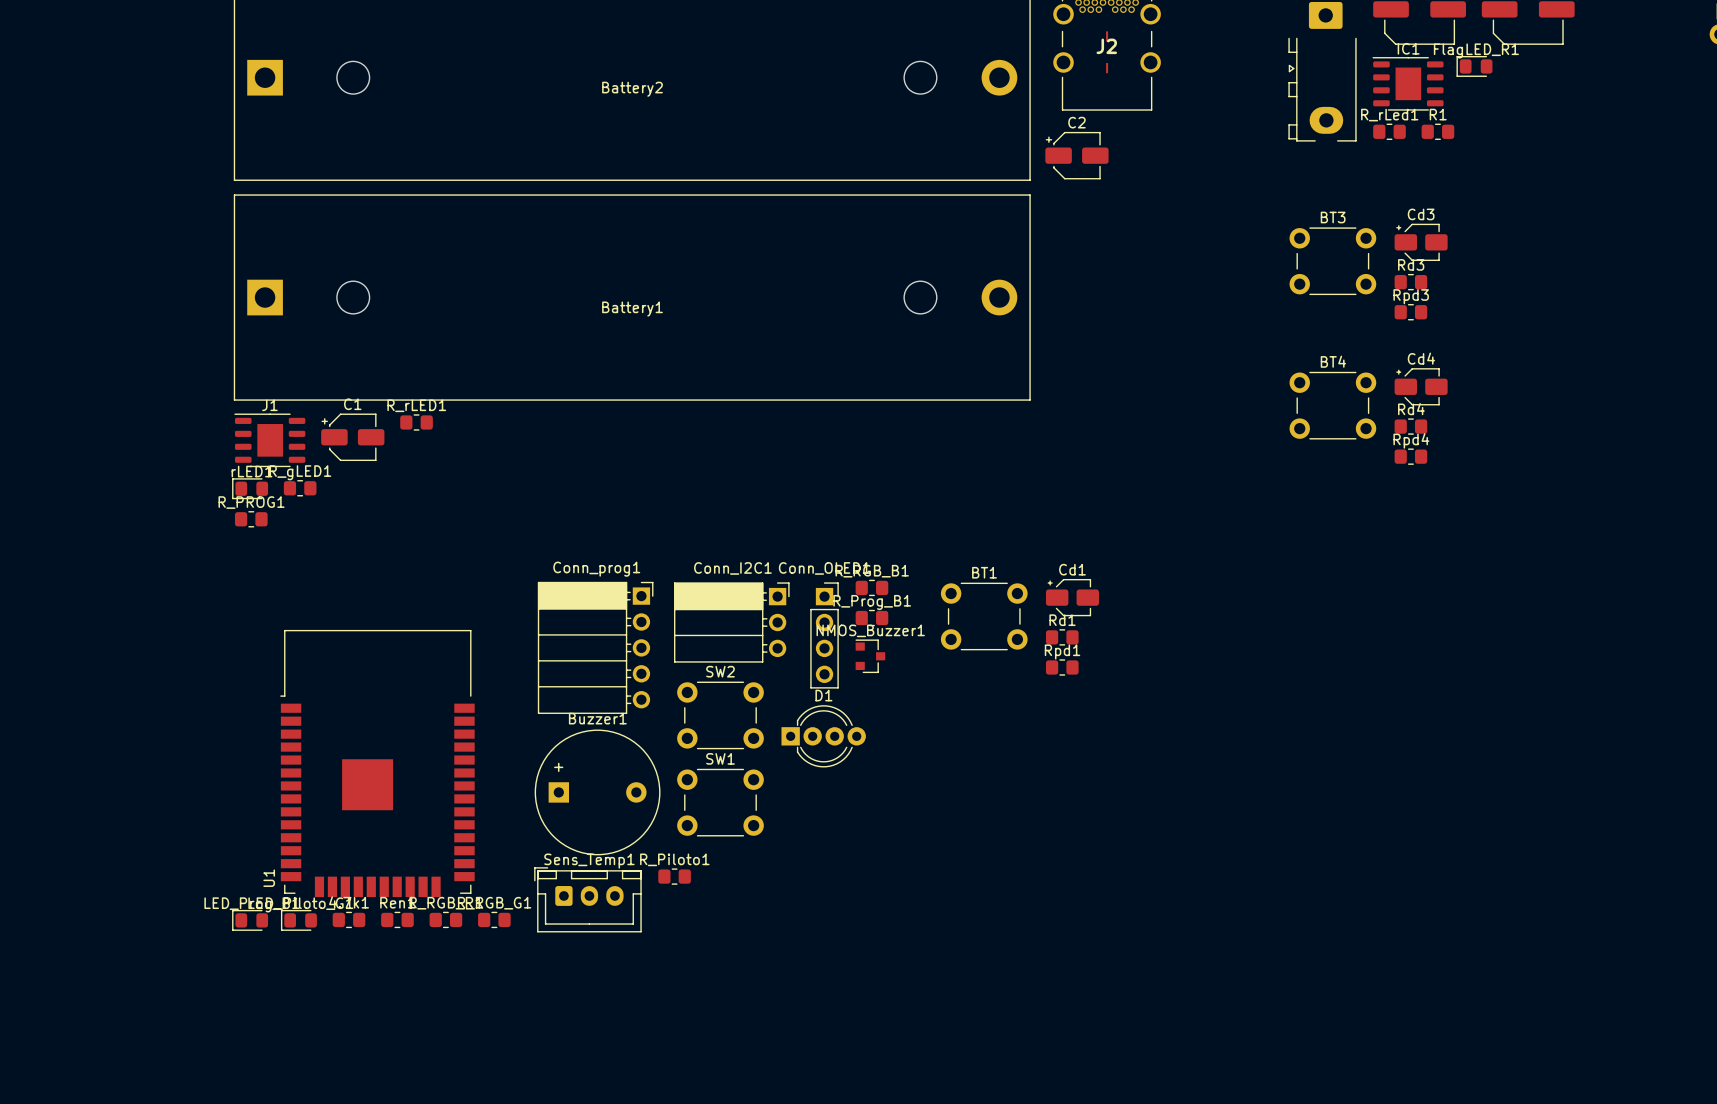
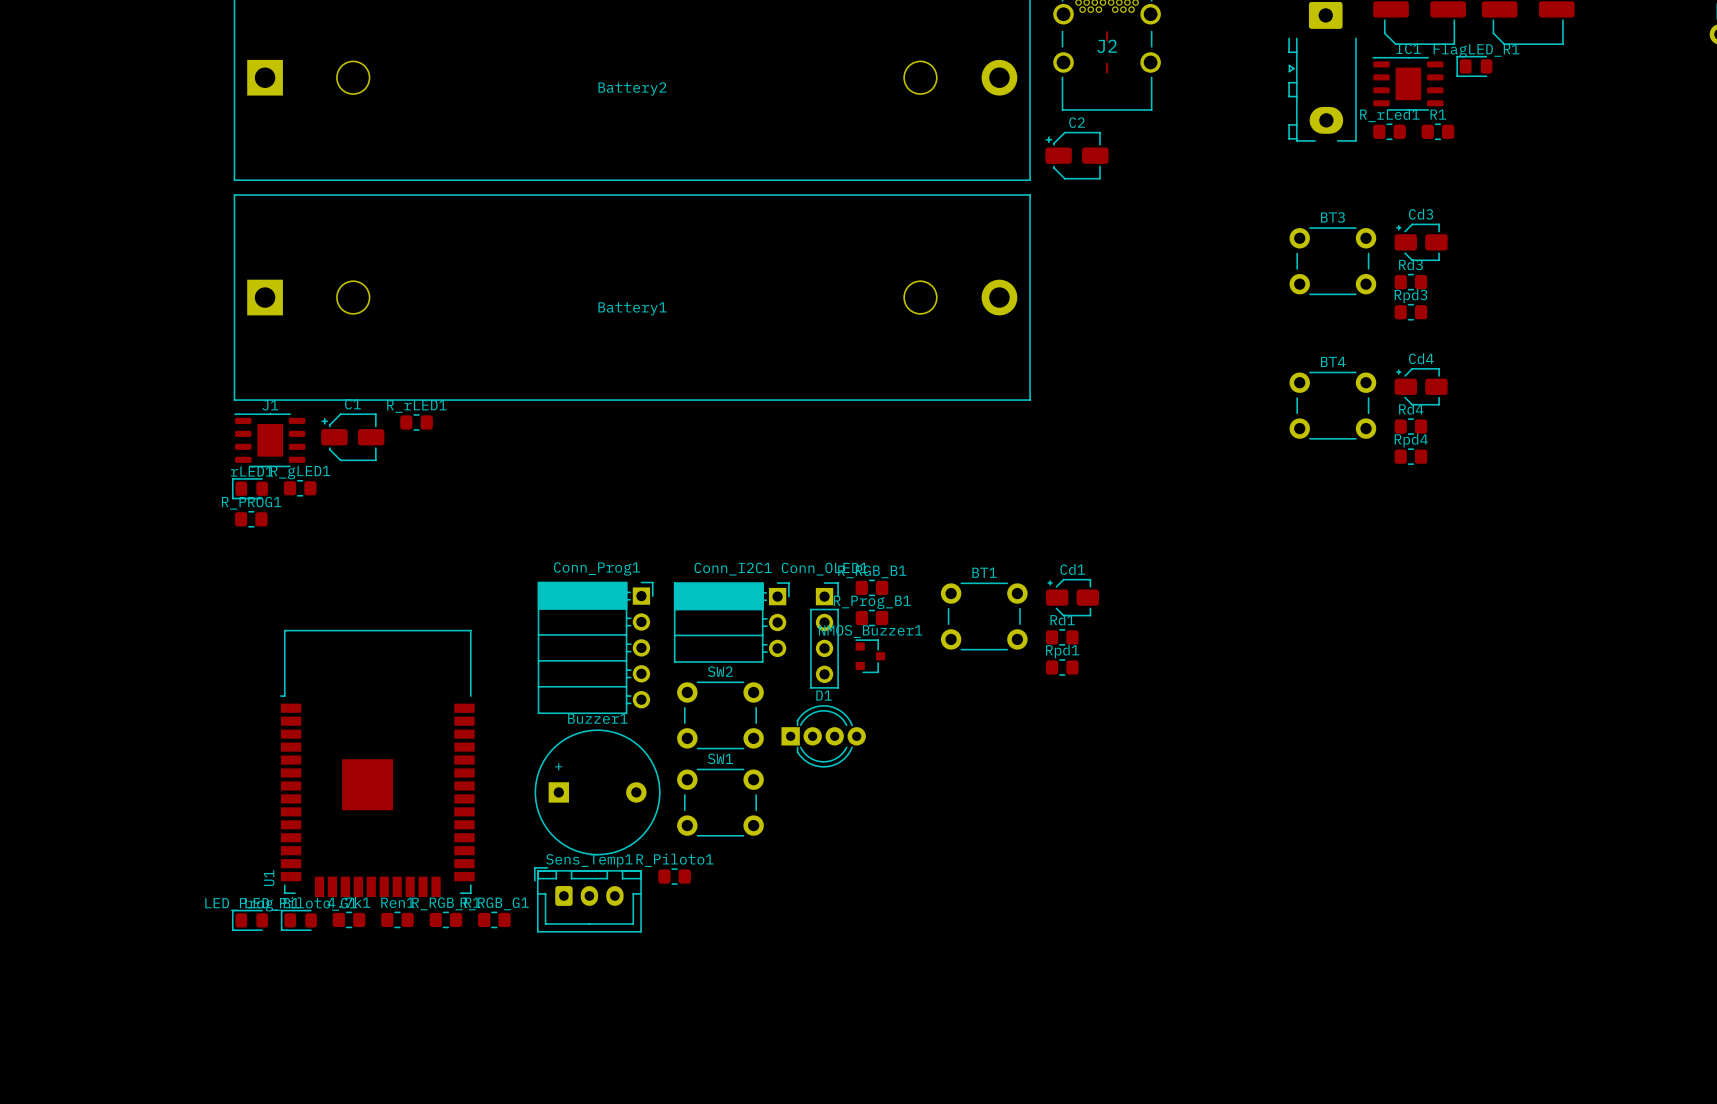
Conn_prog1 name: Conn_prog1 (596, 569) -> Conn_Prog1 (596, 568)

